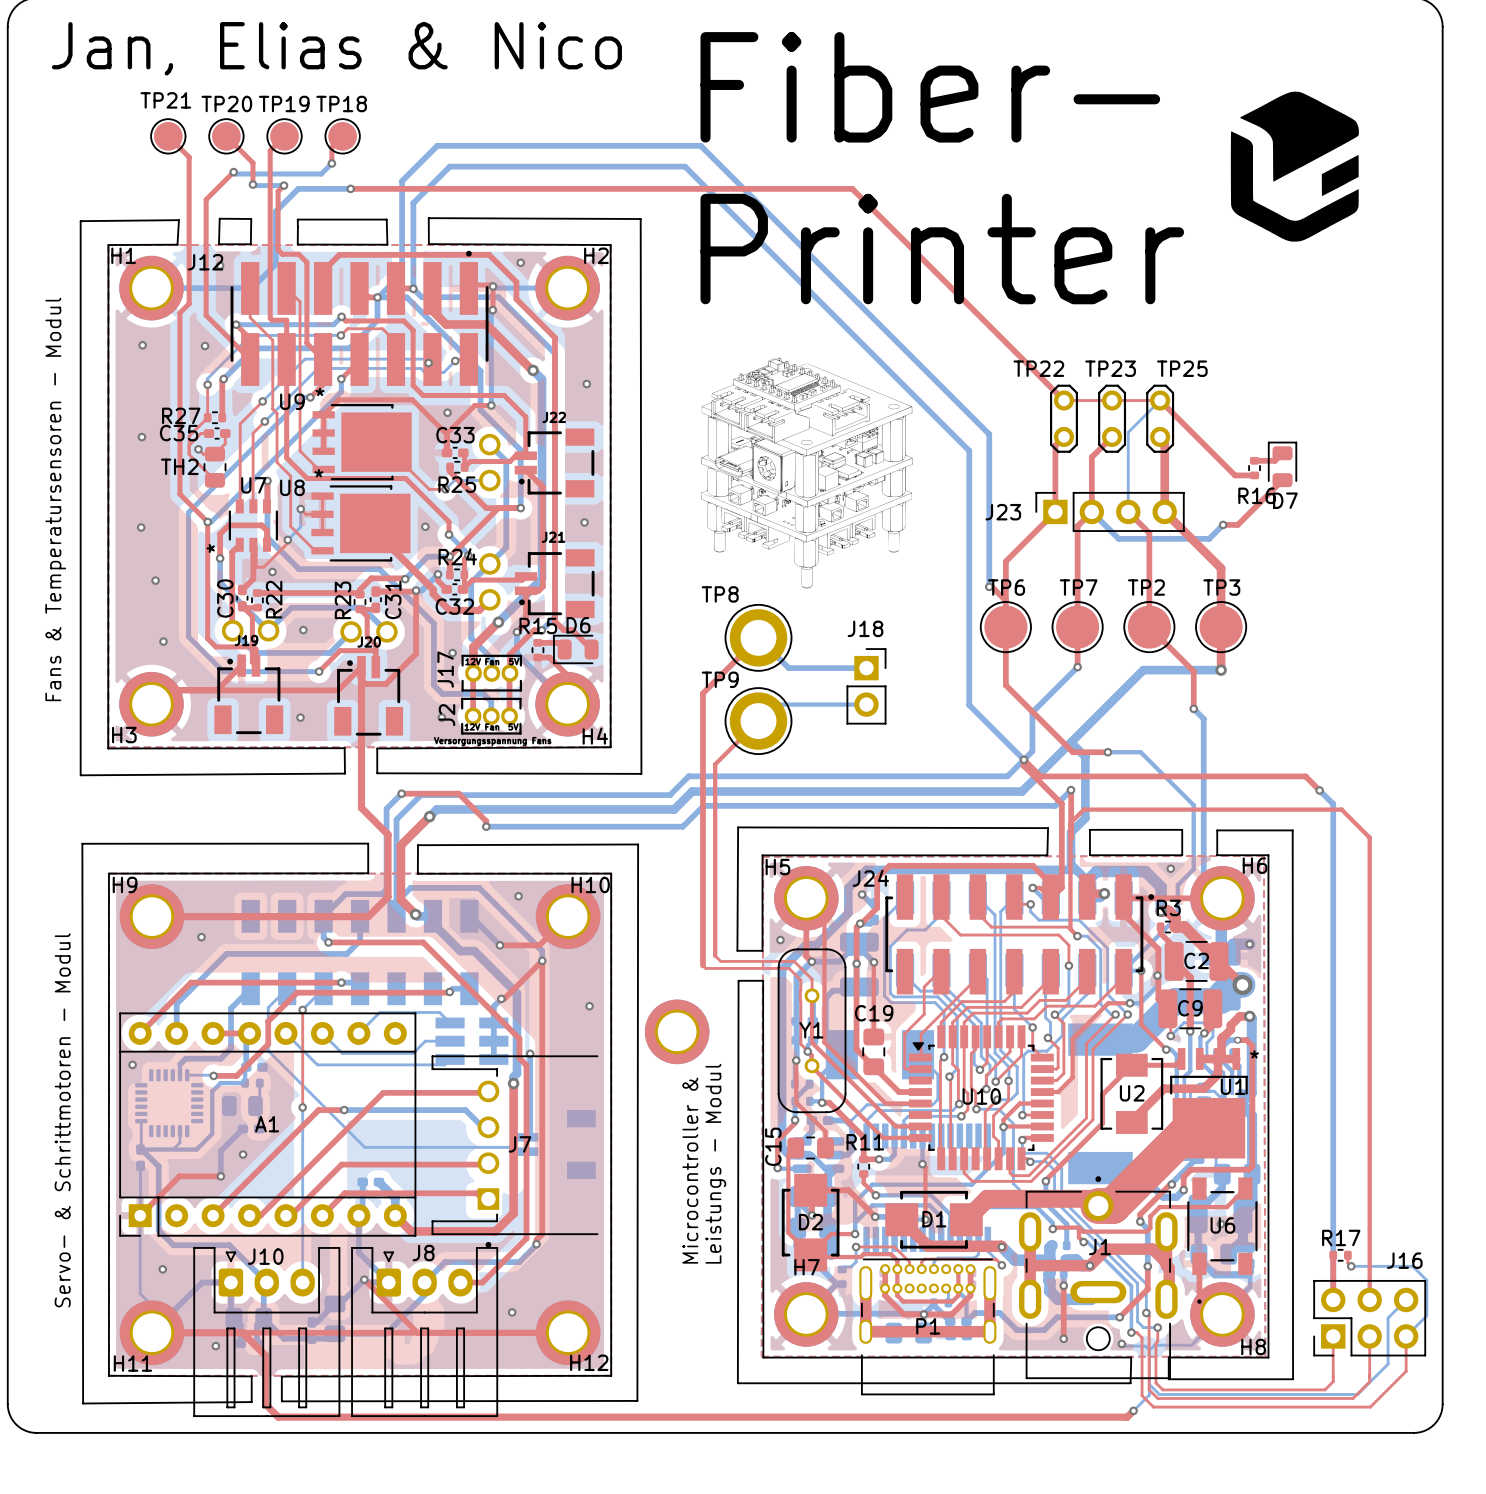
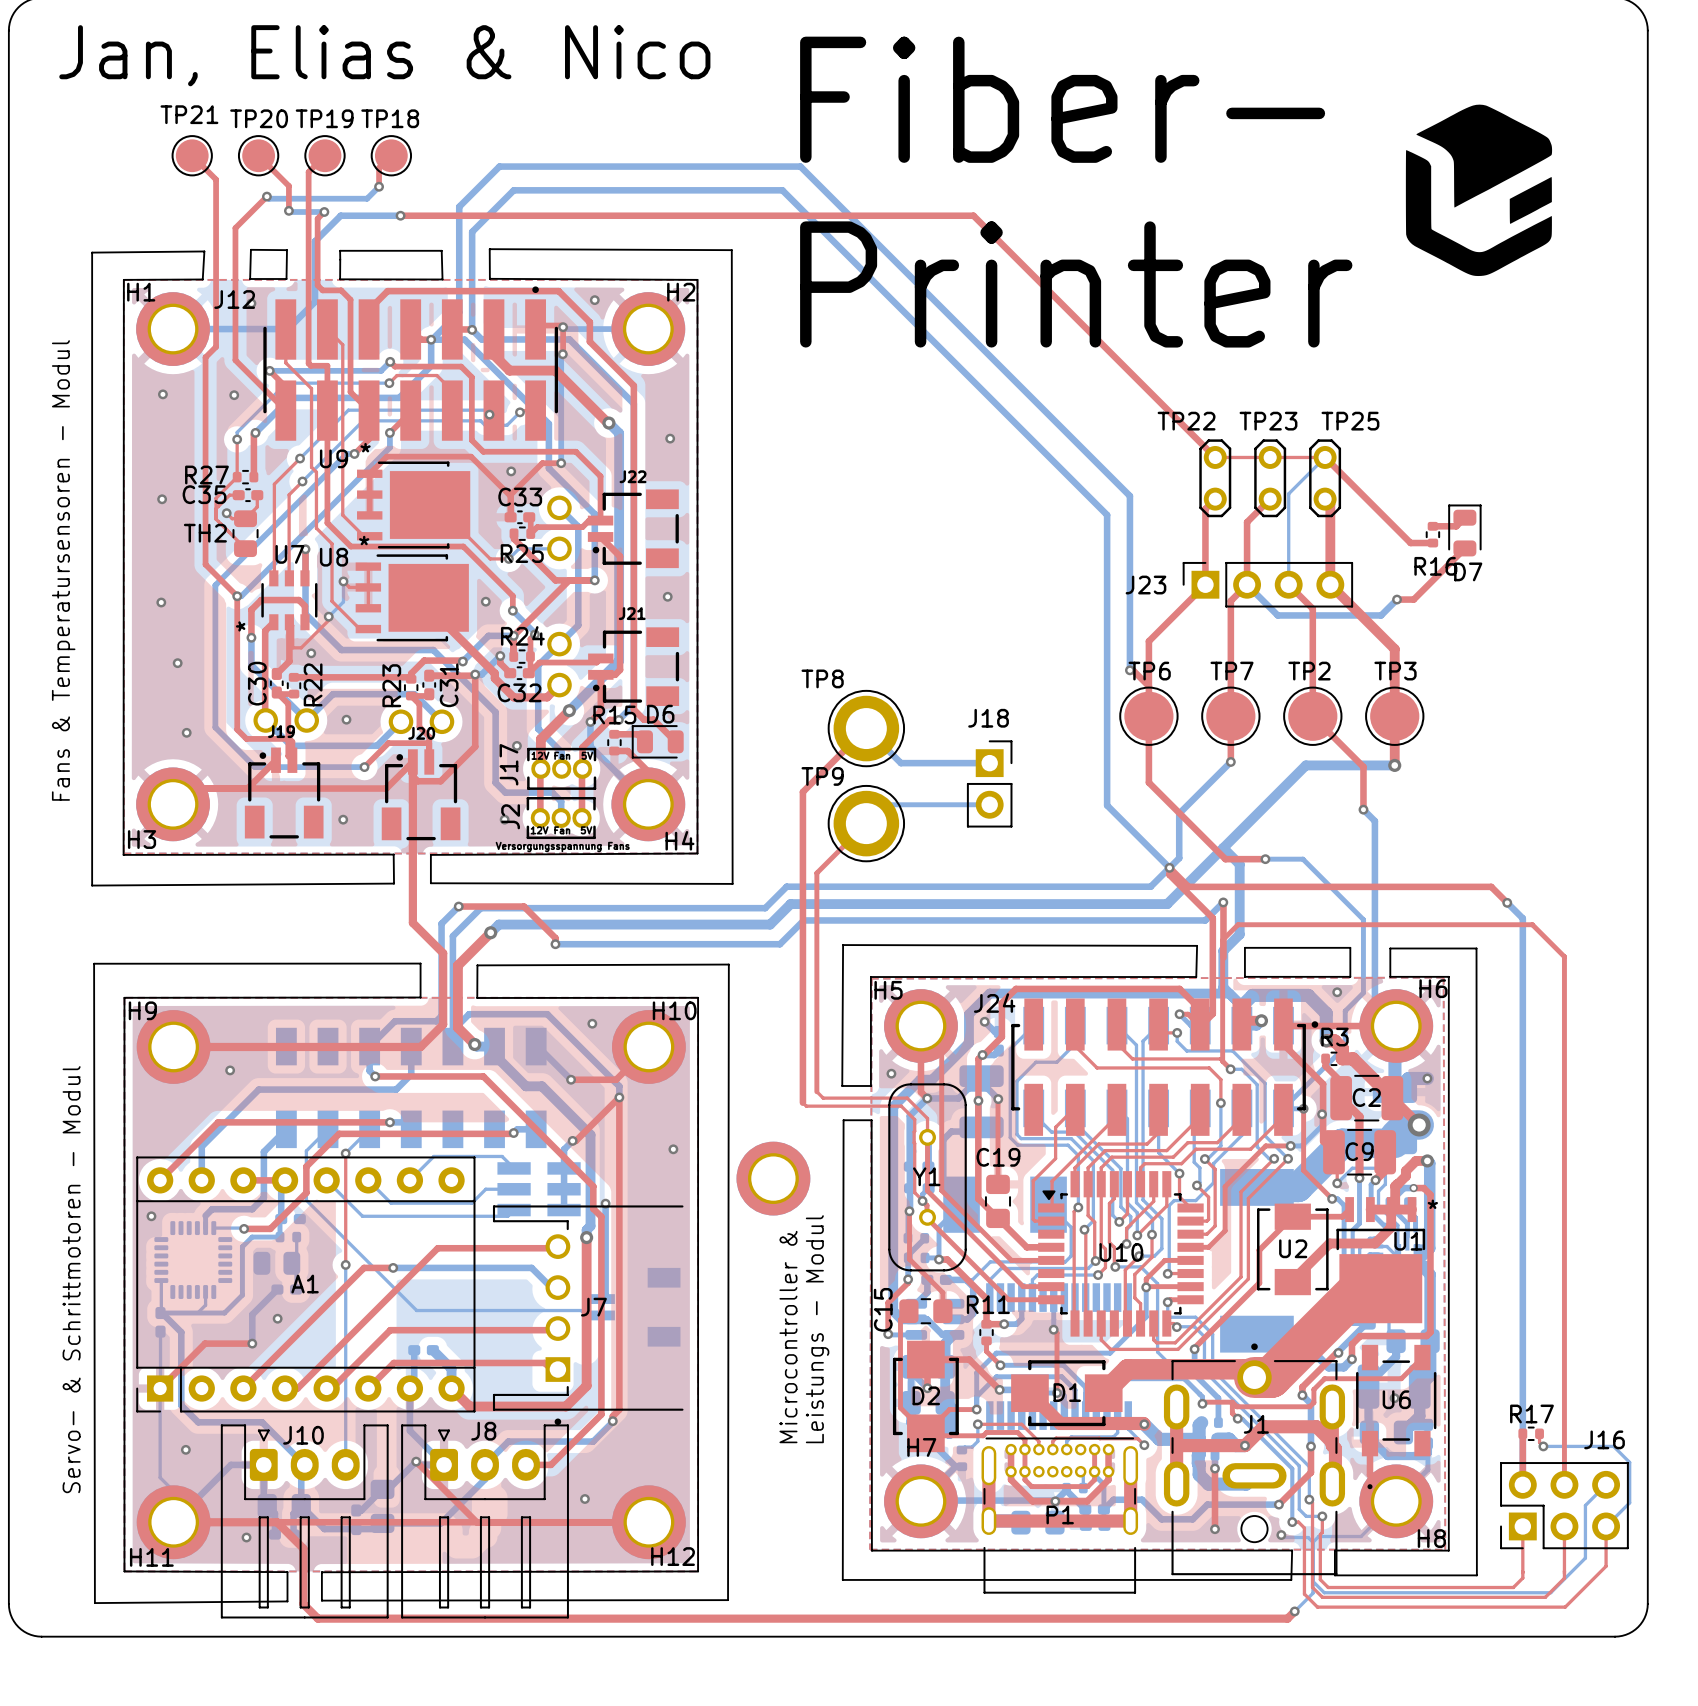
drawing: [701, 357, 913, 589] -> none

